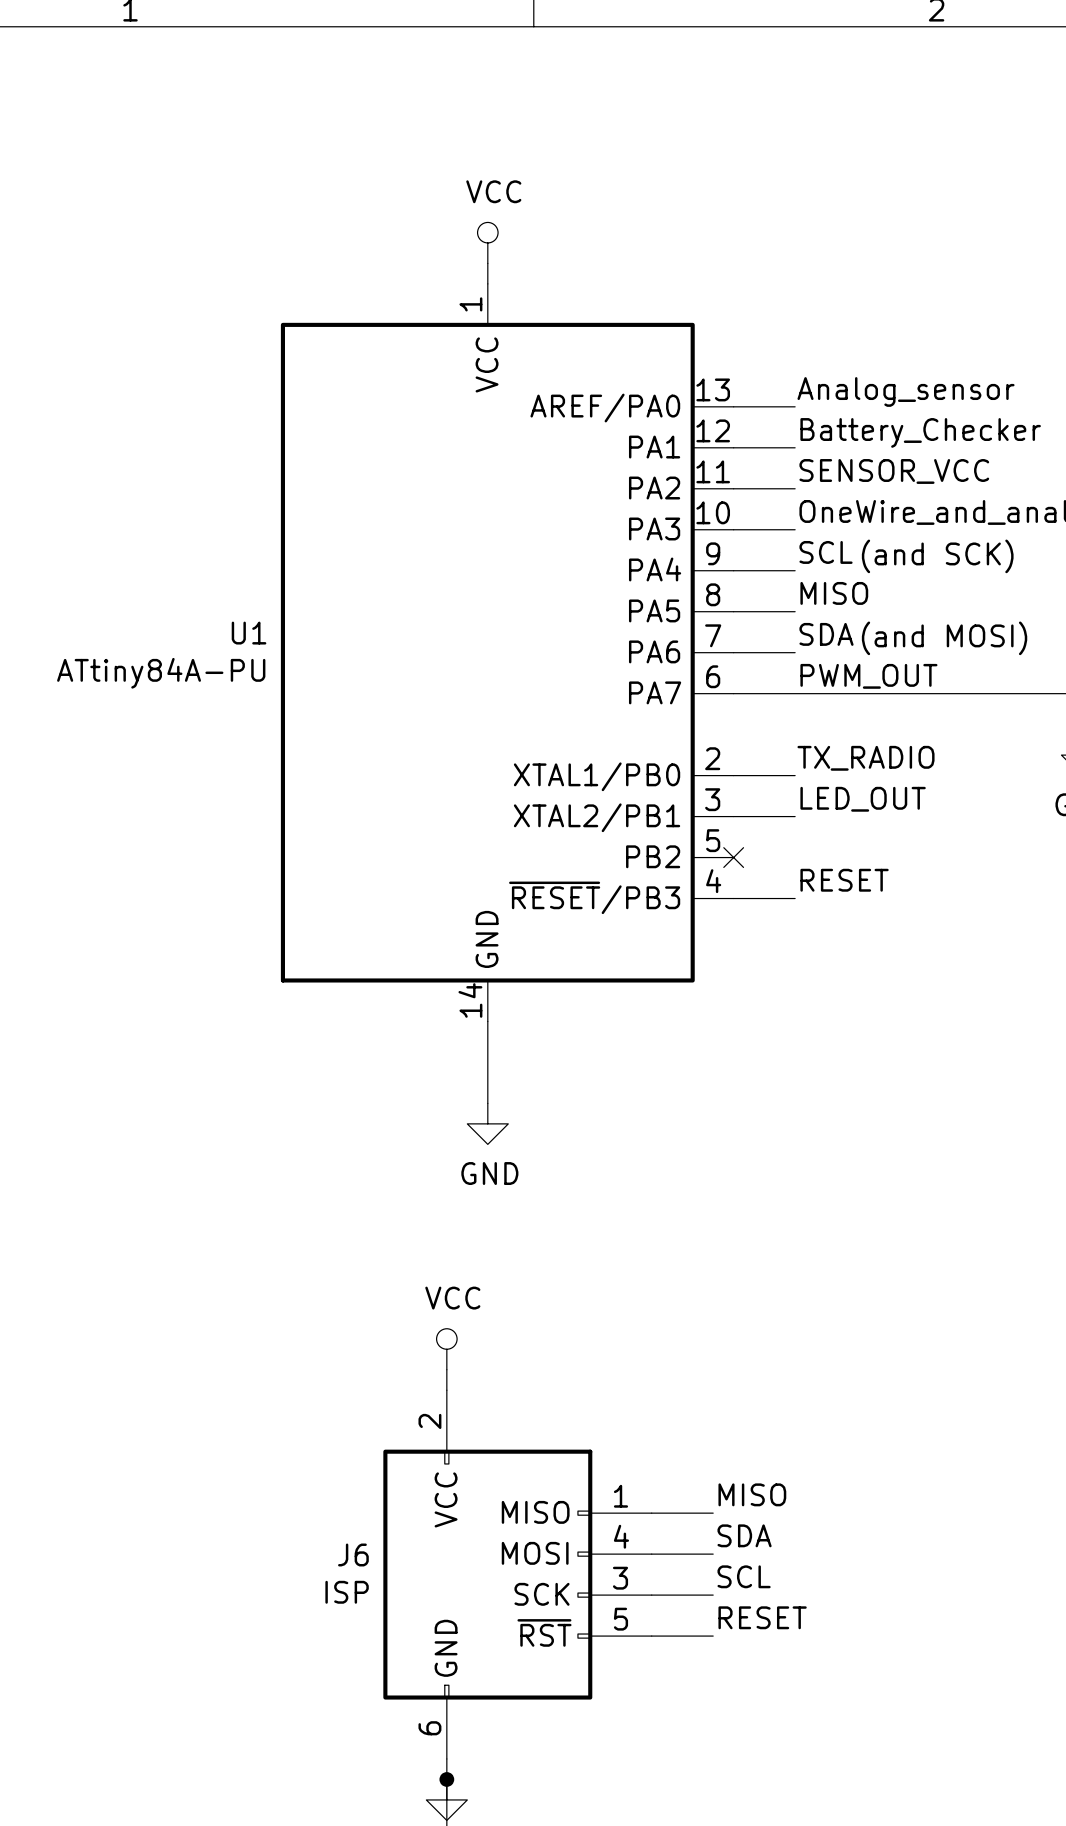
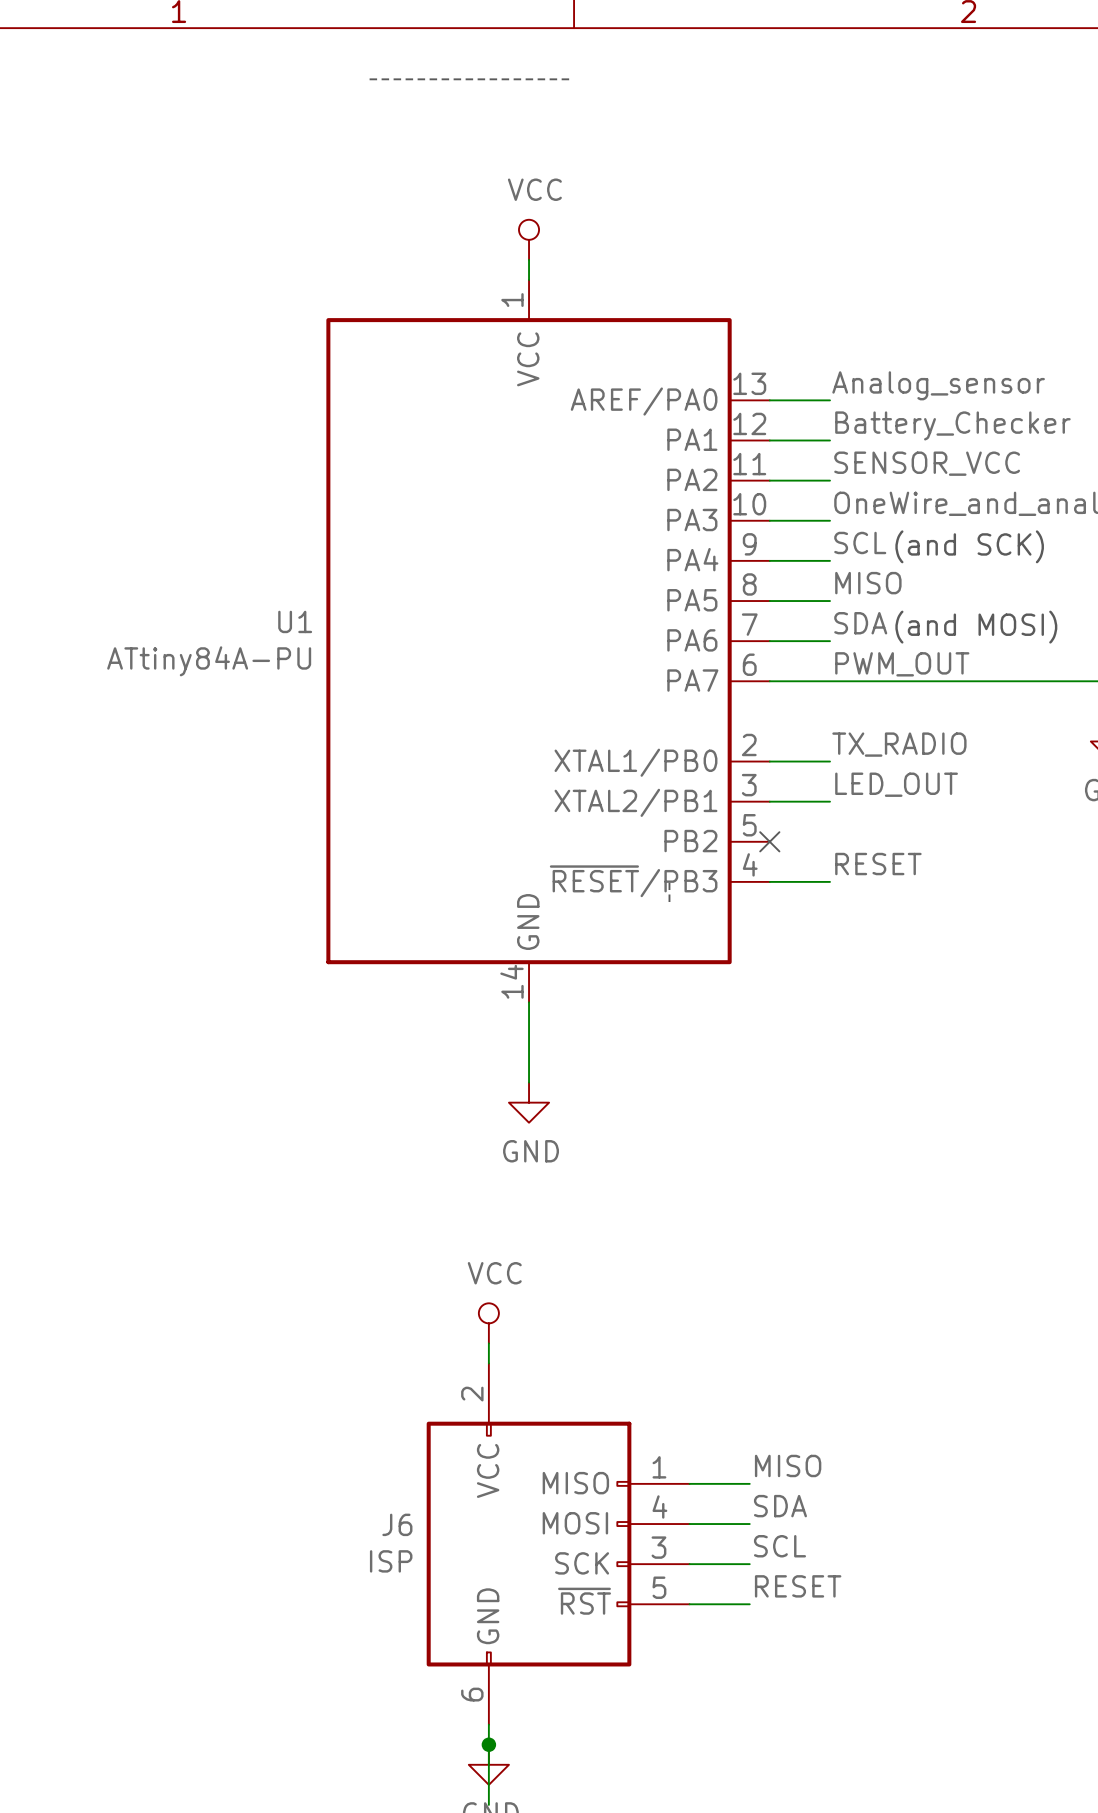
line: none -> (368, 79) (569, 79)
line: none -> (669, 881) (669, 901)

